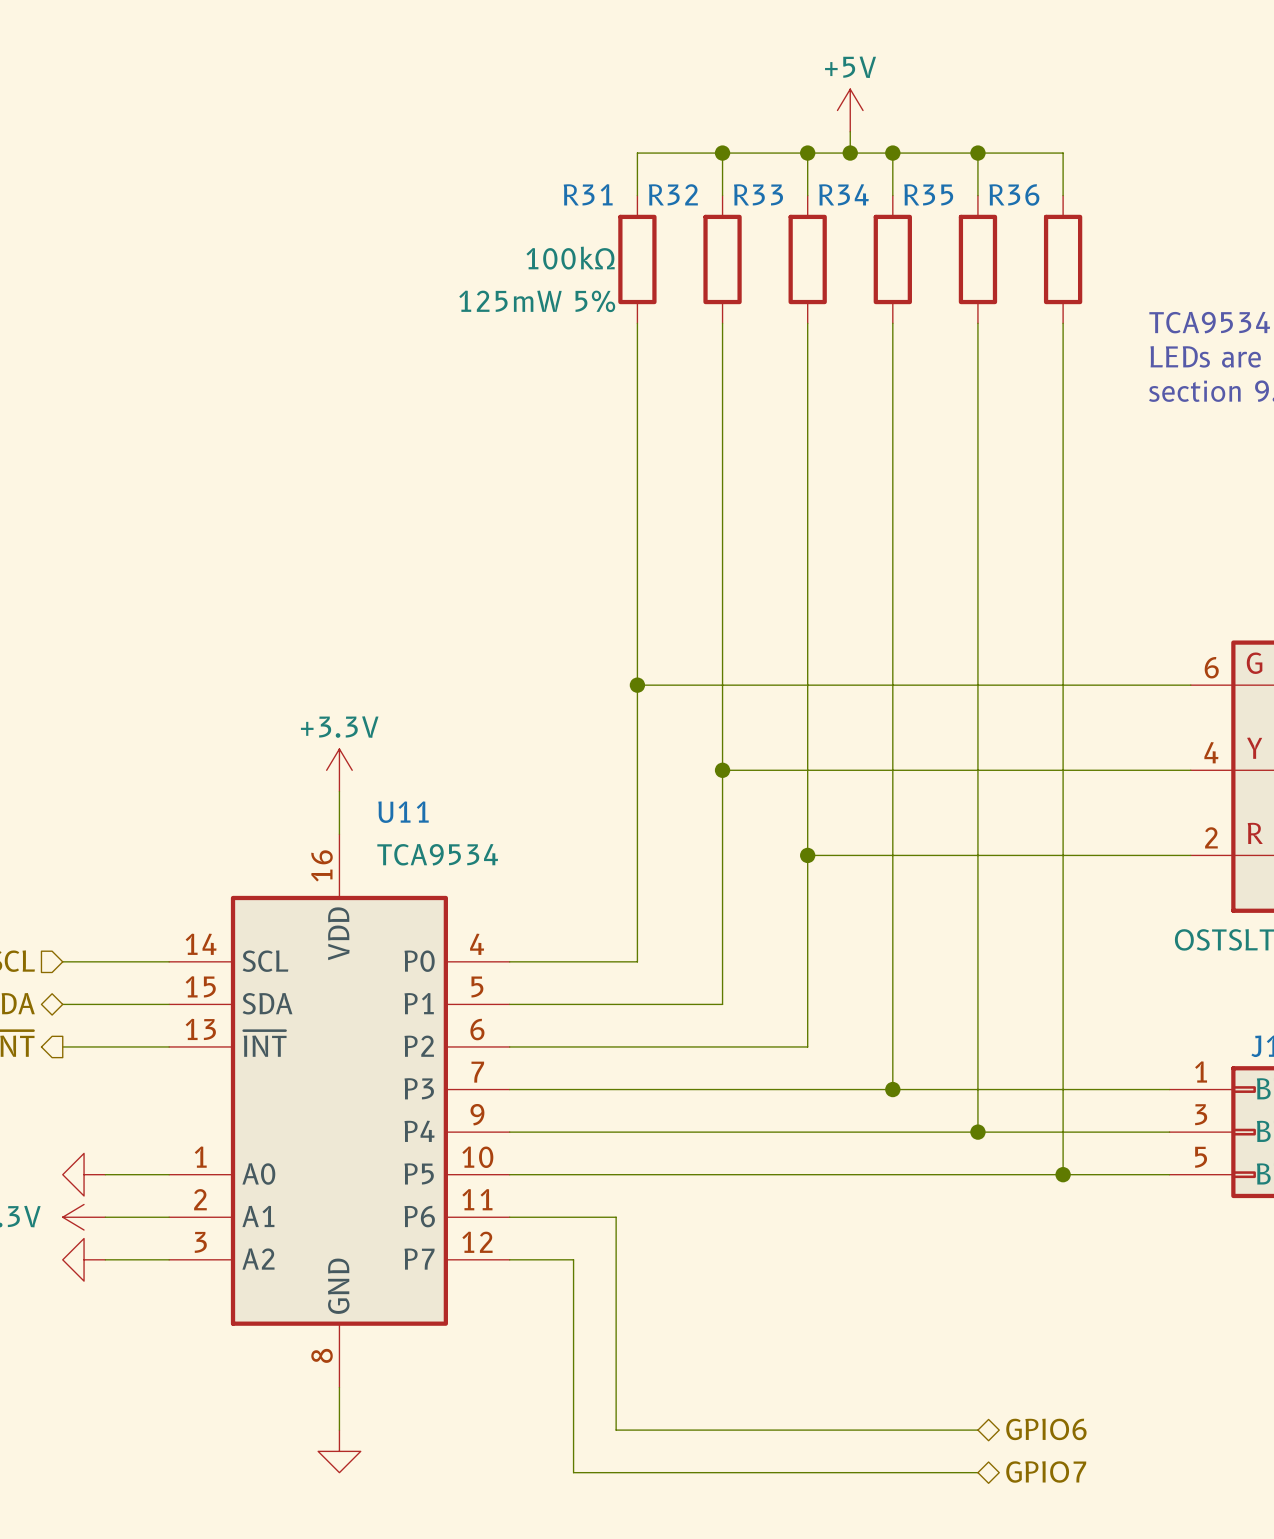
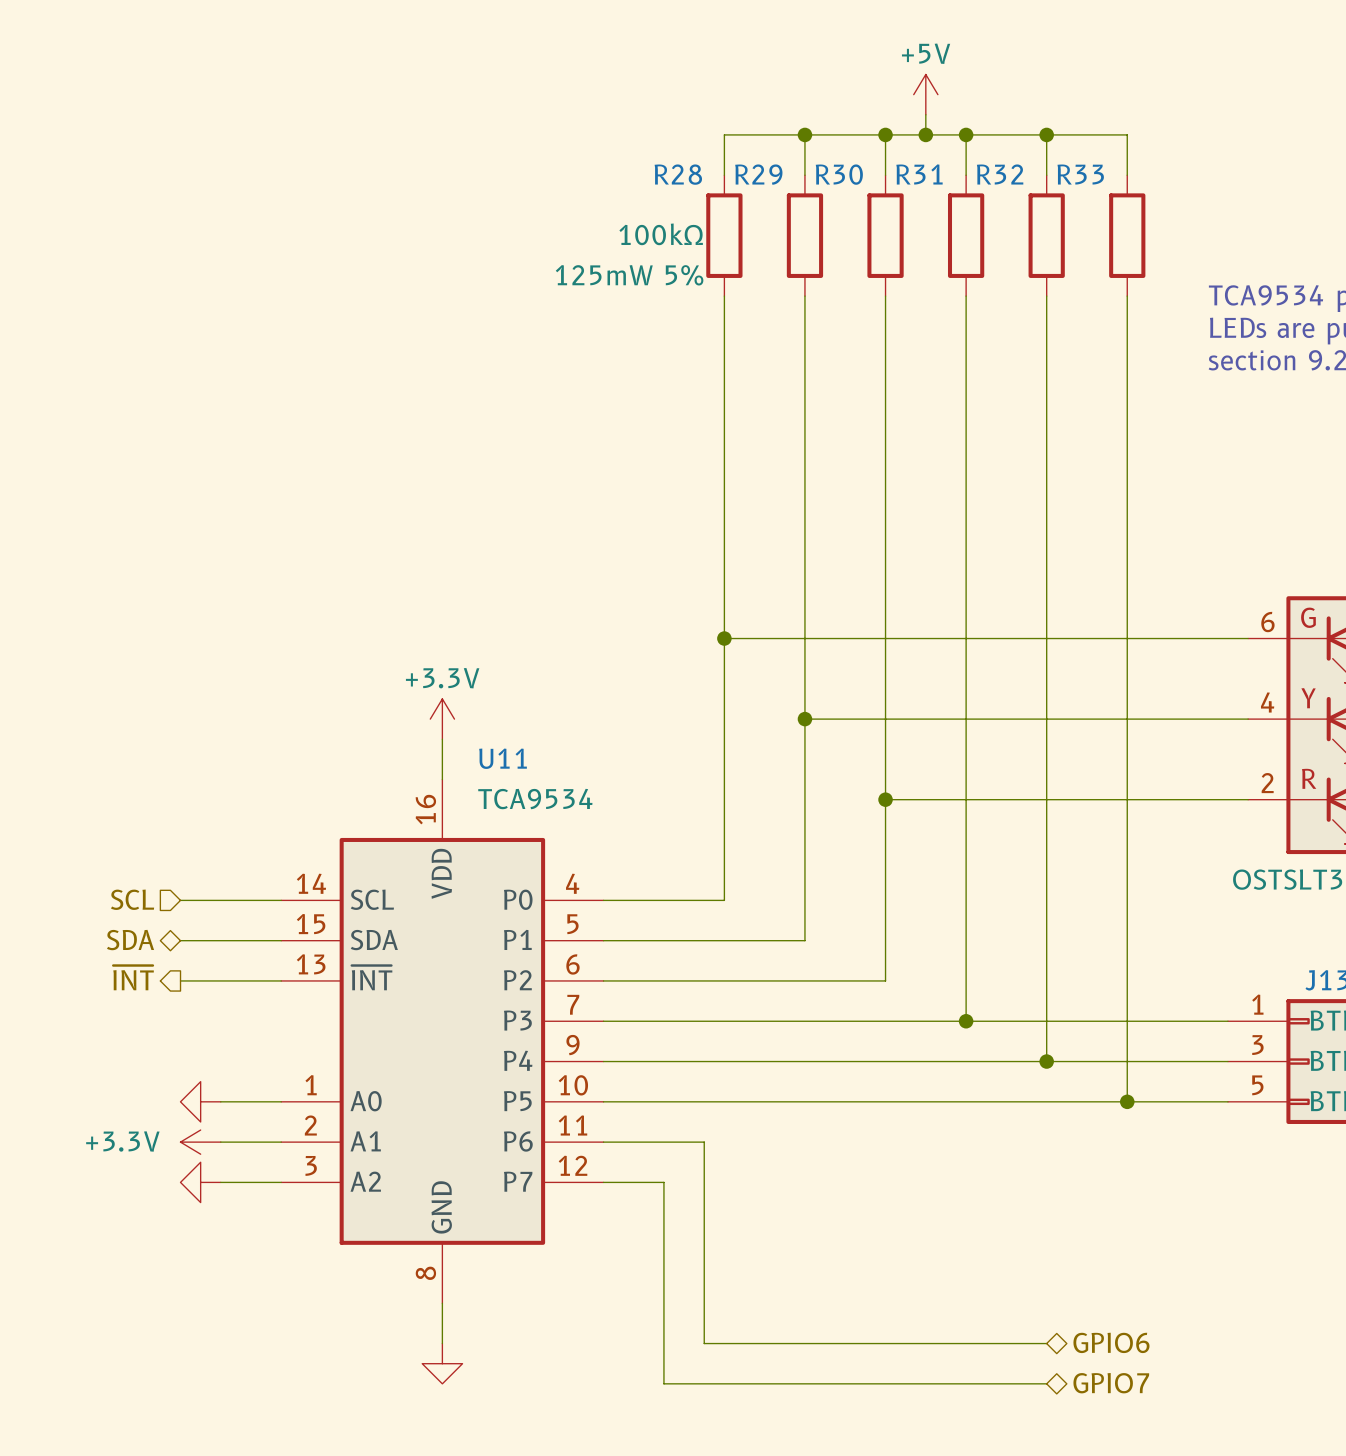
R31 name: R31 (588, 194) -> R28 (678, 174)
R32 name: R32 (673, 194) -> R29 (758, 174)
R33 name: R33 (758, 194) -> R30 (839, 174)
R34 name: R34 (843, 194) -> R31 (919, 174)
R35 name: R35 (928, 194) -> R32 (1000, 174)
R36 name: R36 (1014, 194) -> R33 (1080, 174)

